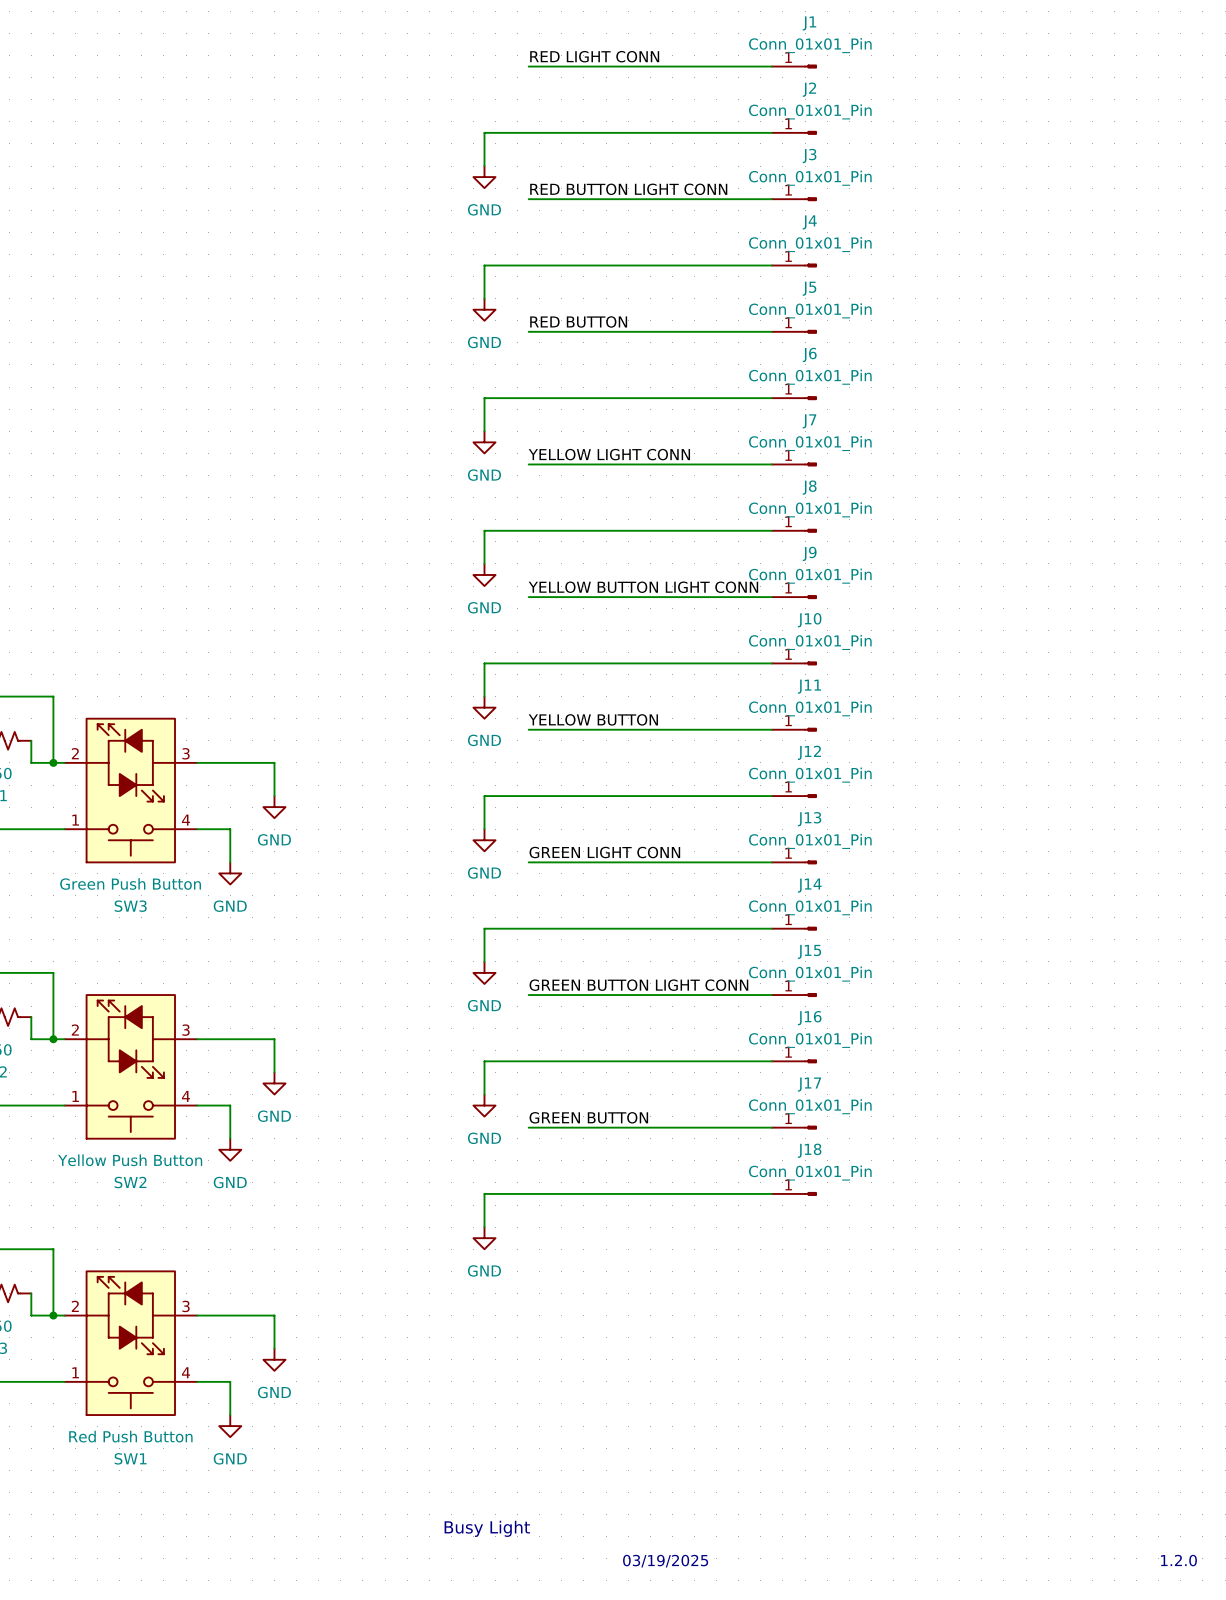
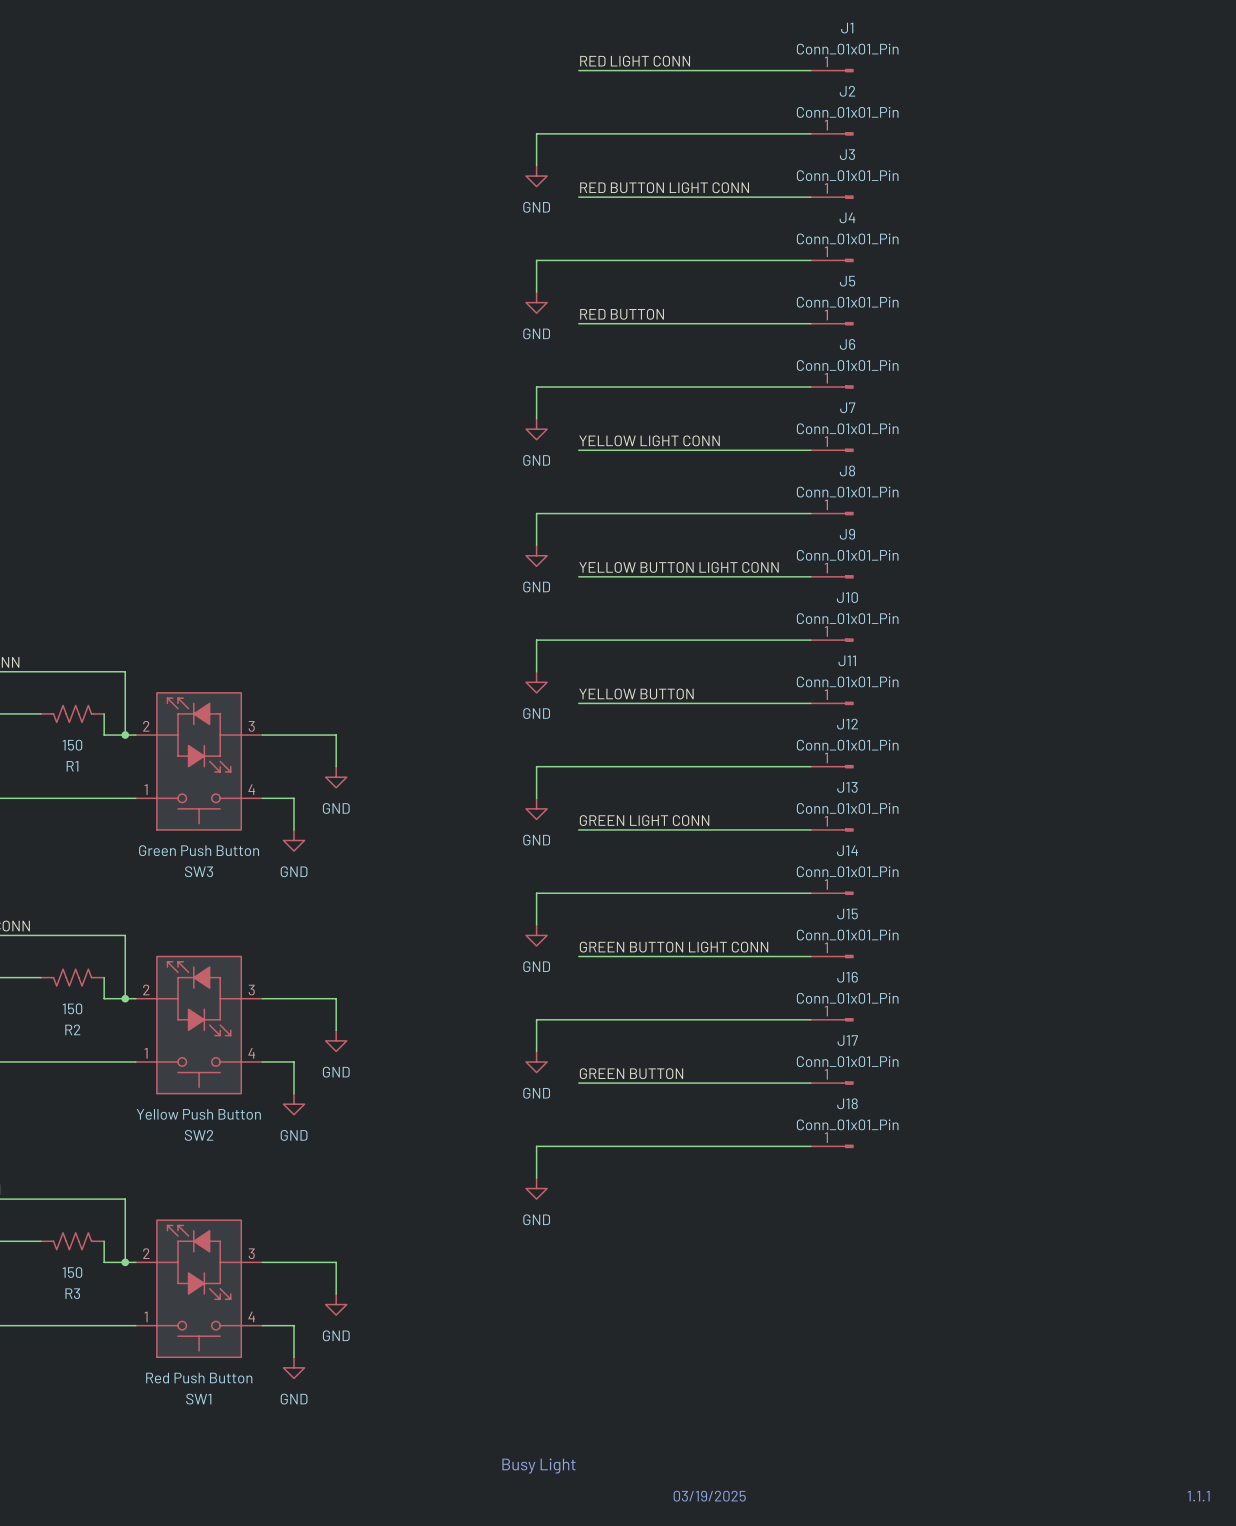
text: 1.2.0 (1178, 1560) -> 1.1.1 (1198, 1496)

